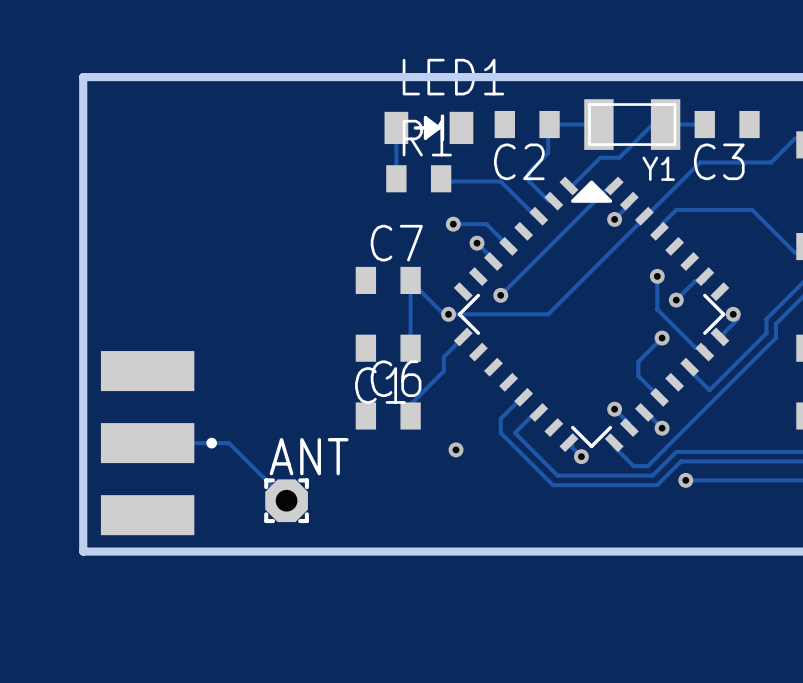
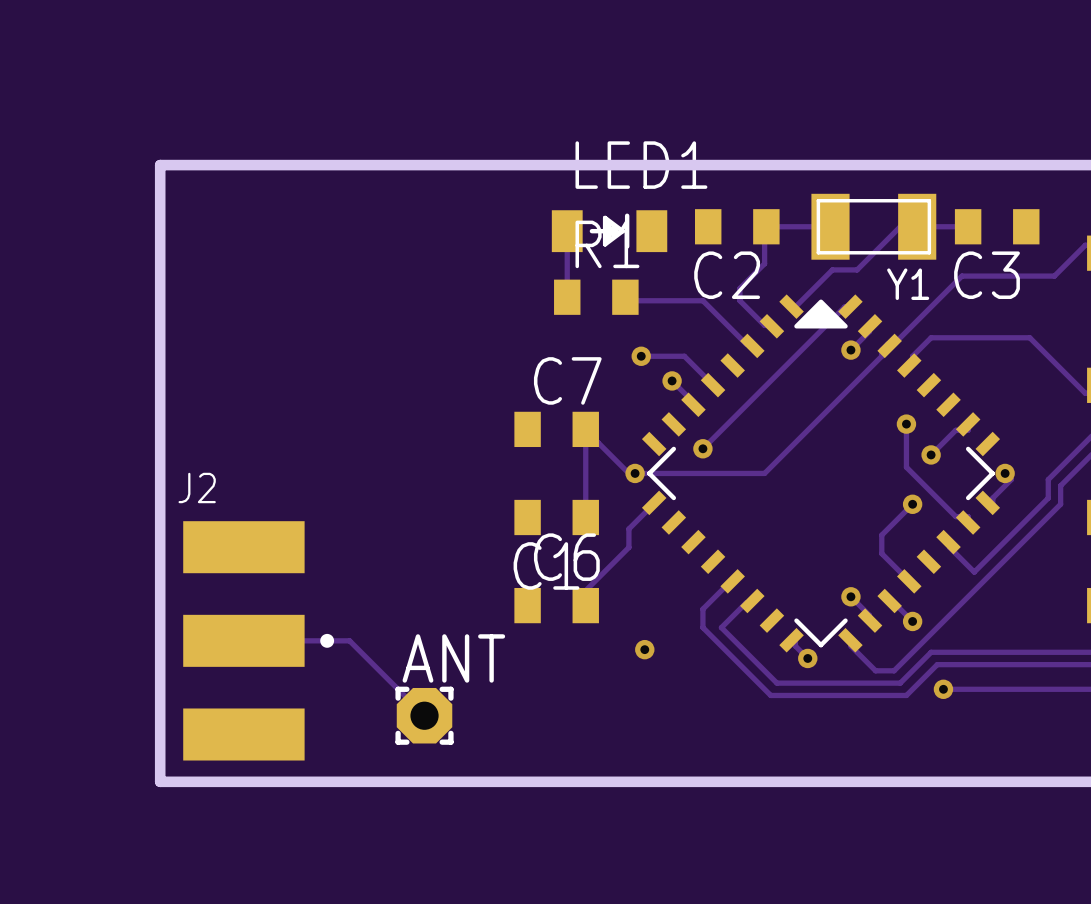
J2 name: none -> J2 (197, 488)

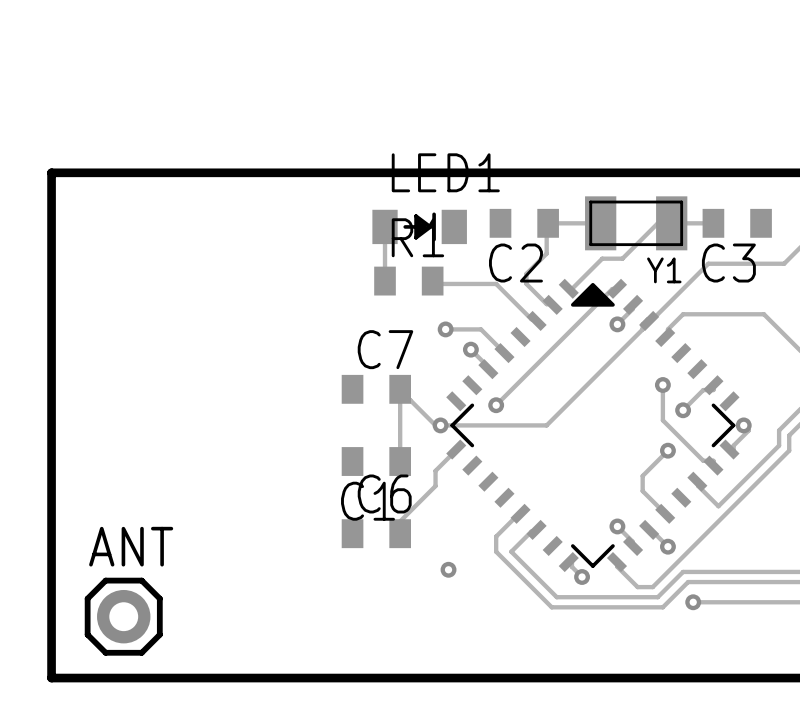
track: (243, 640) (349, 640) (424, 715) -> none
J2: (258, 640) -> none
ANT: none -> (123, 616)
ANT: (424, 715) -> none

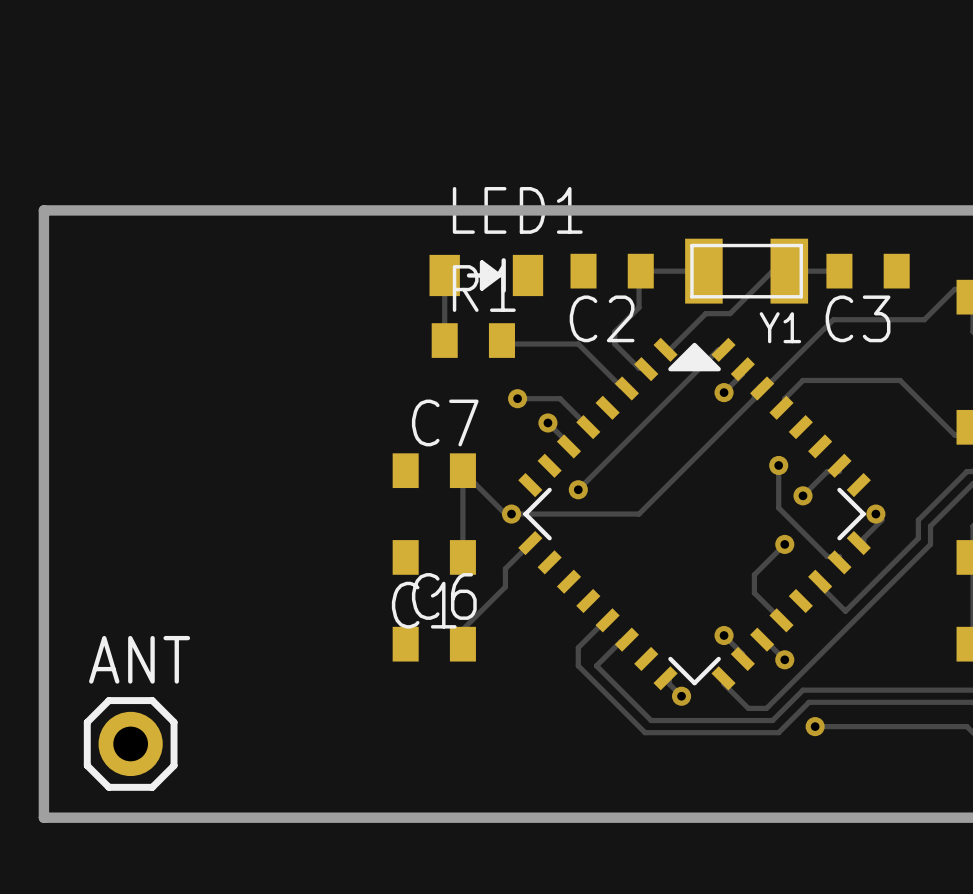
via: (448, 569) -> none

